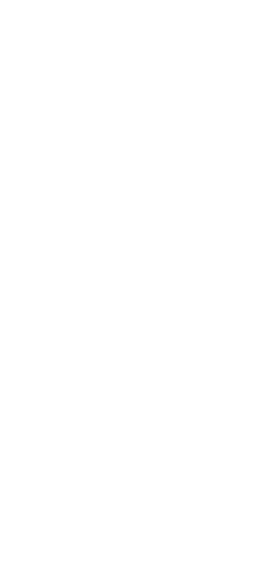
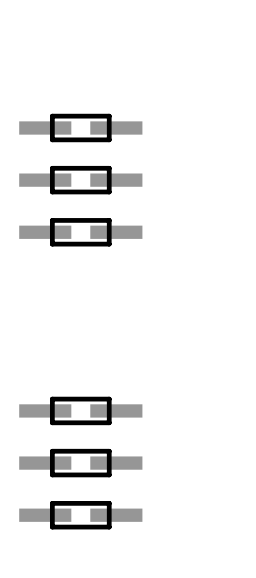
part: none -> (80, 128)
part: none -> (80, 180)
part: none -> (80, 232)
part: none -> (80, 410)
part: none -> (80, 463)
part: none -> (80, 515)

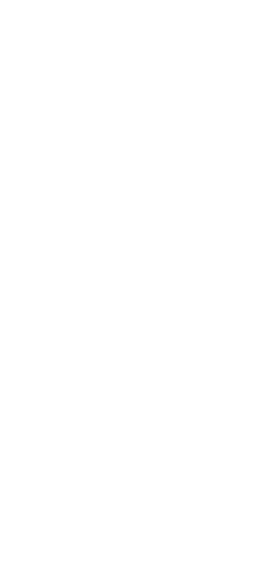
part: (80, 128) -> none
part: (80, 180) -> none
part: (80, 232) -> none
part: (80, 410) -> none
part: (80, 463) -> none
part: (80, 515) -> none

